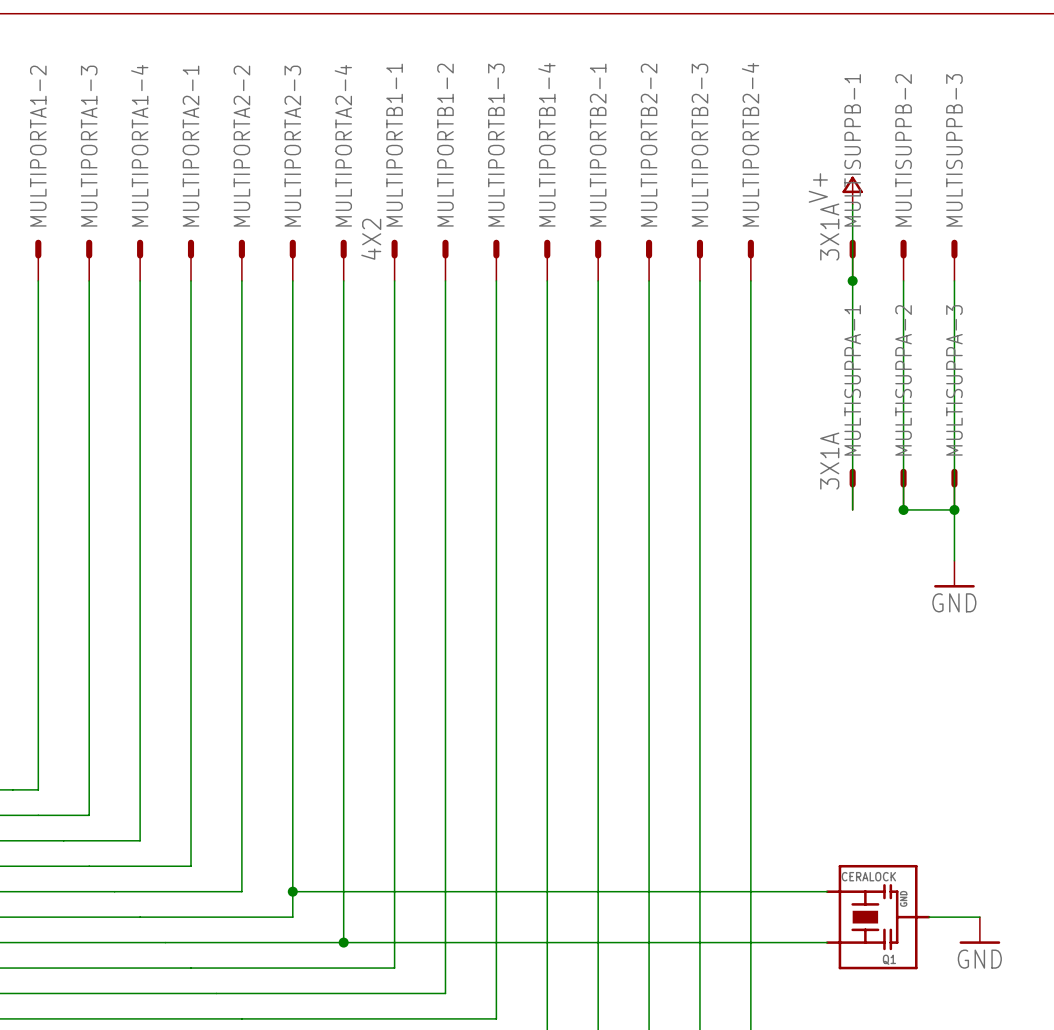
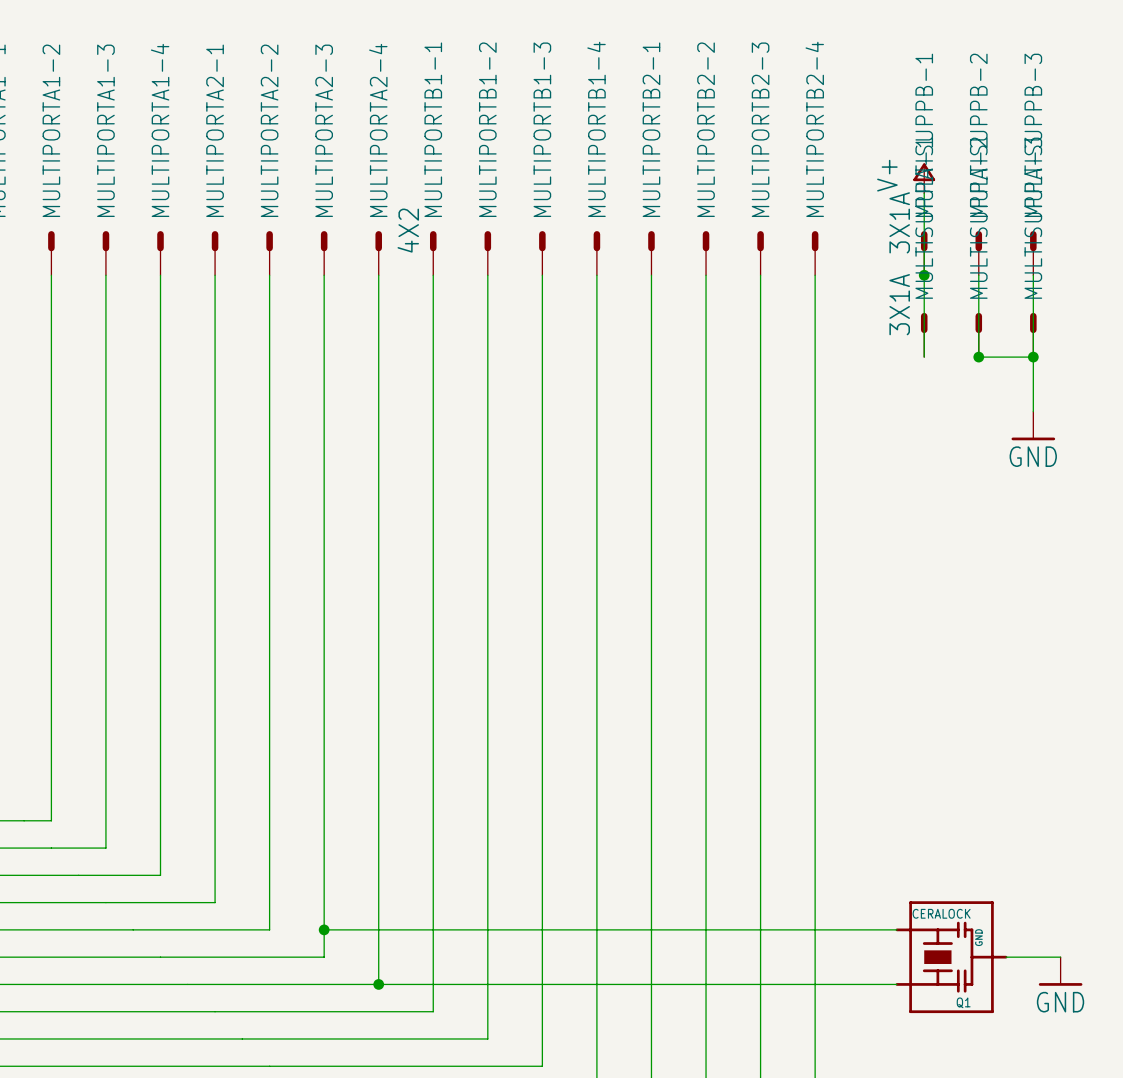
wire: (852, 357) (852, 509) -> none
wire: (903, 357) (903, 509) (954, 509) -> (978, 357) (1033, 357)
junction: none -> (978, 357)
junction: none -> (1033, 357)
wire: (954, 408) (954, 560) -> none
MULTISUPPA-1 position: (852, 489) -> (924, 335)
MULTISUPPA-2 position: (903, 489) -> (978, 335)
MULTISUPPA-3 position: (954, 489) -> (1033, 335)
junction: (903, 509) -> none
junction: (954, 509) -> none
power symbol position: GND (954, 574) -> GND (1033, 425)

